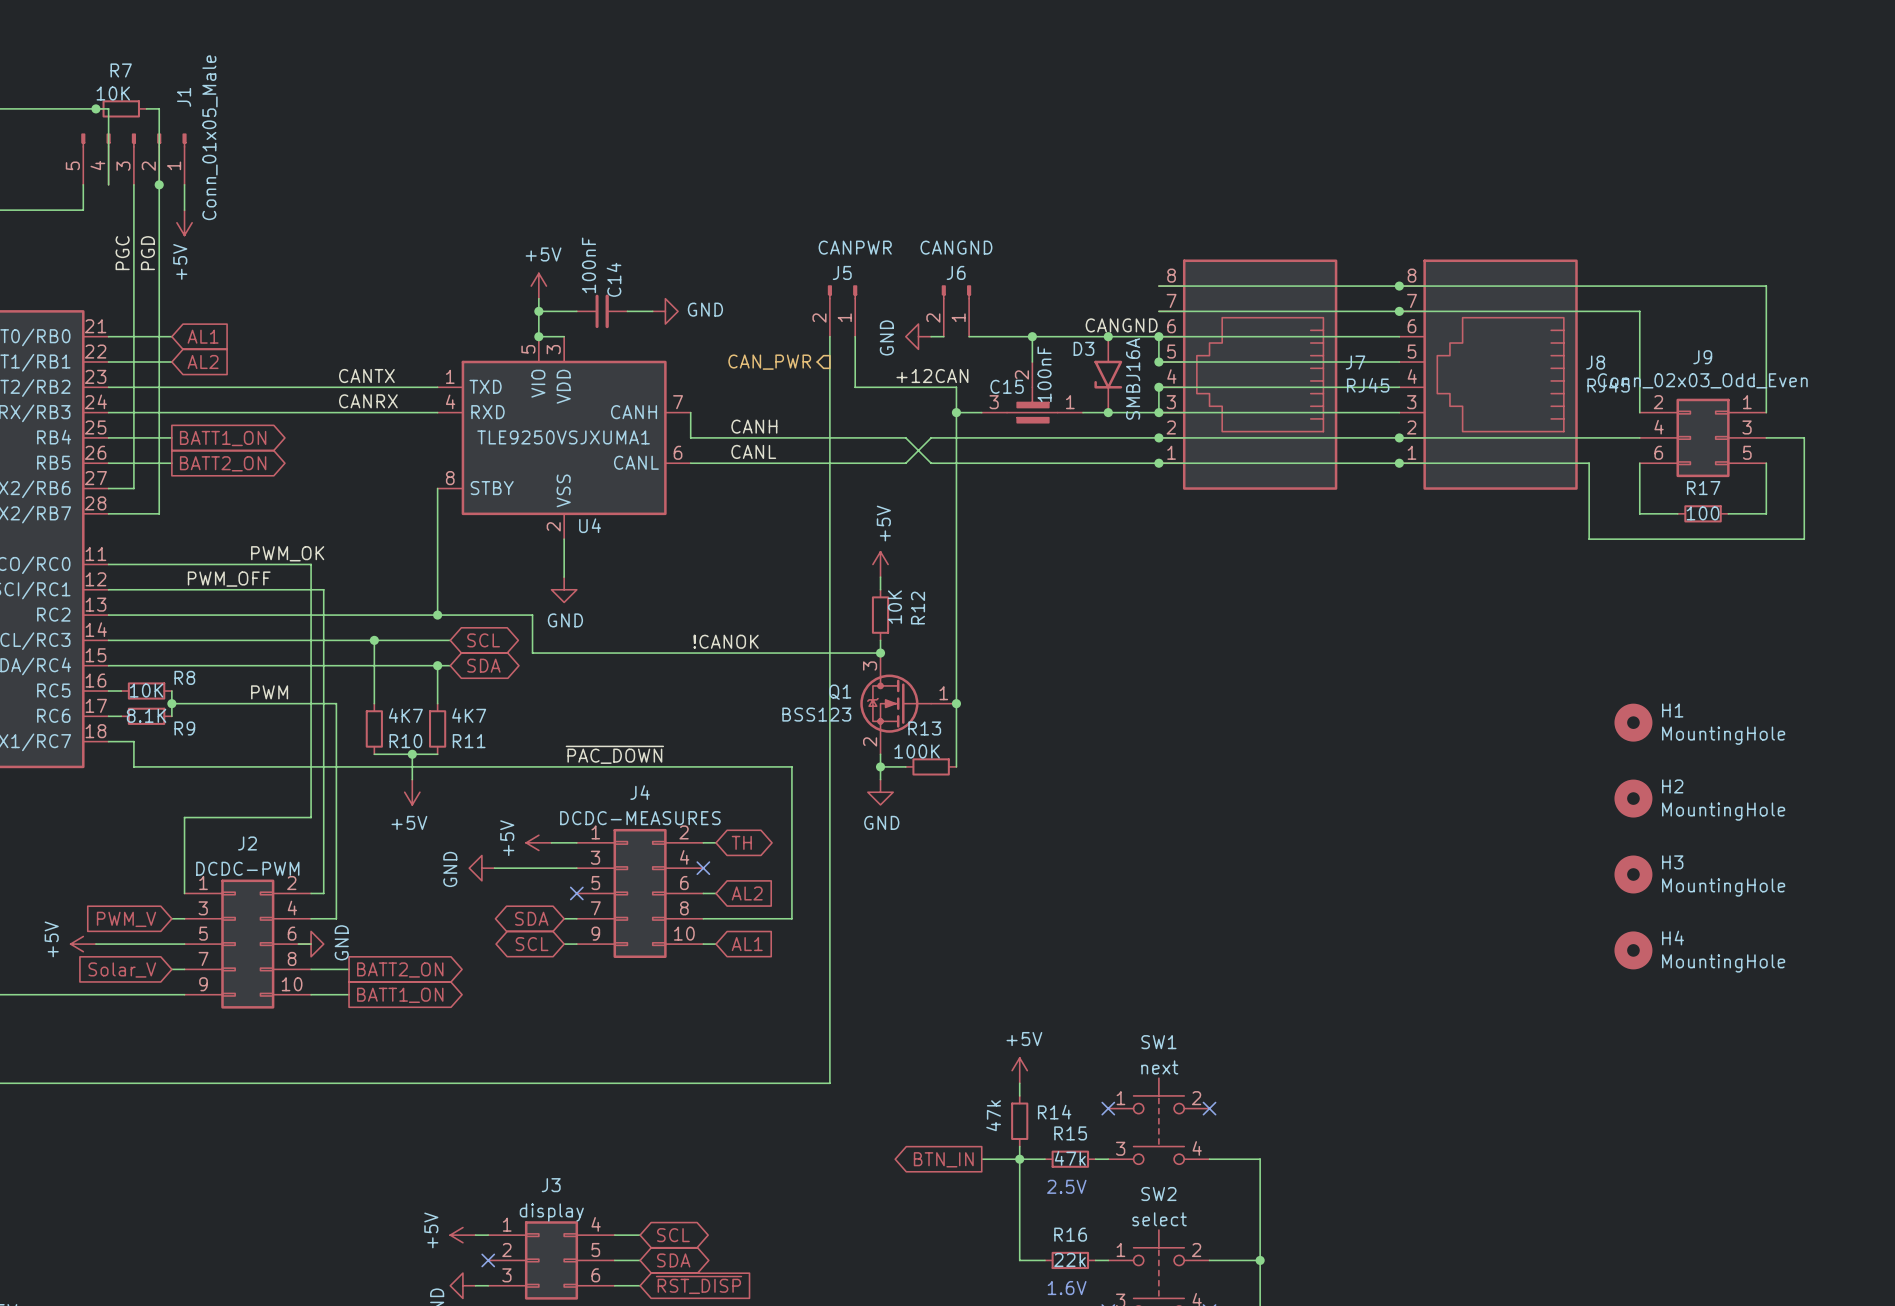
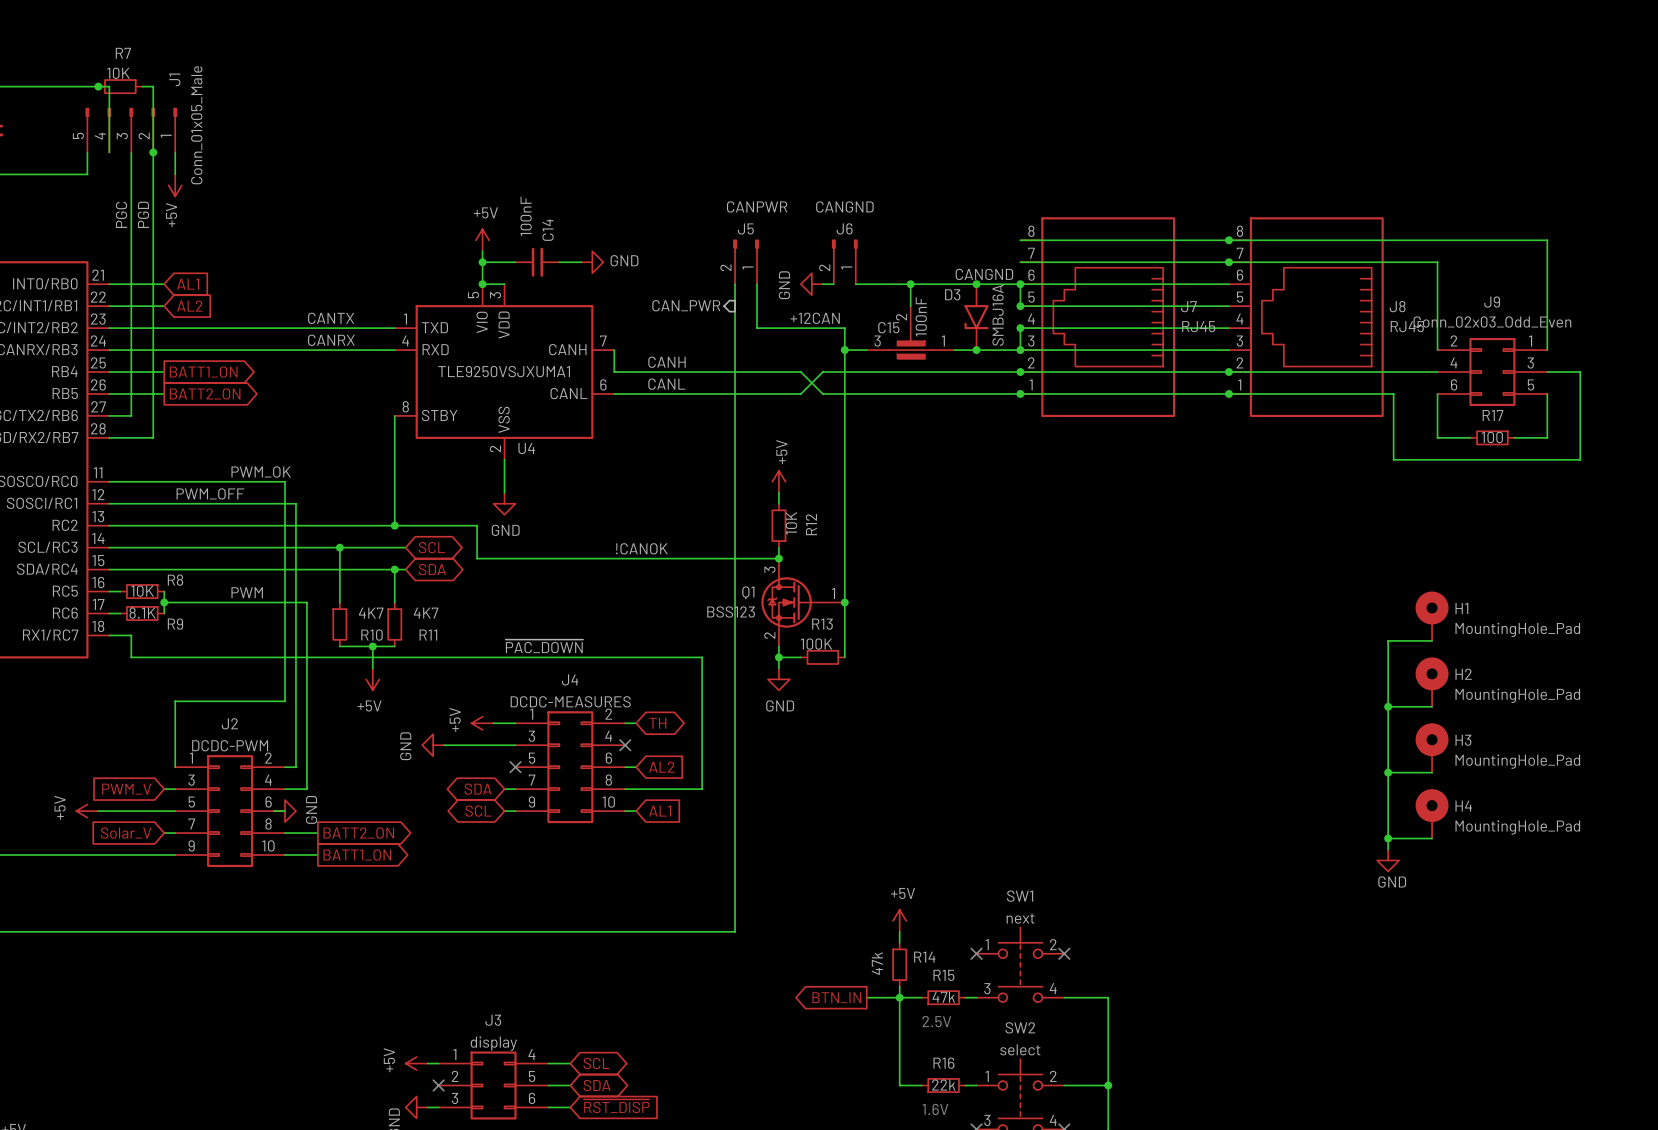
H1 symbol: [1614, 703, 1653, 742] -> [1415, 591, 1449, 641]
H1 value: MountingHole (1723, 735) -> MountingHole_Pad (1517, 629)
wire: none -> (1432, 640) (1388, 640) (1388, 849)
H2 symbol: [1614, 779, 1653, 818] -> [1415, 657, 1449, 707]
H2 value: MountingHole (1723, 811) -> MountingHole_Pad (1517, 695)
wire: none -> (1388, 706) (1432, 706)
junction: none -> (1388, 706)
H3 symbol: [1614, 855, 1653, 894] -> [1415, 723, 1449, 773]
H3 value: MountingHole (1723, 887) -> MountingHole_Pad (1517, 761)
wire: none -> (1388, 772) (1432, 772)
junction: none -> (1388, 772)
H4 symbol: [1614, 931, 1653, 970] -> [1415, 789, 1449, 839]
H4 value: MountingHole (1723, 963) -> MountingHole_Pad (1517, 827)
wire: none -> (1388, 838) (1432, 838)
junction: none -> (1388, 838)
power symbol: none -> GND (1388, 860)

